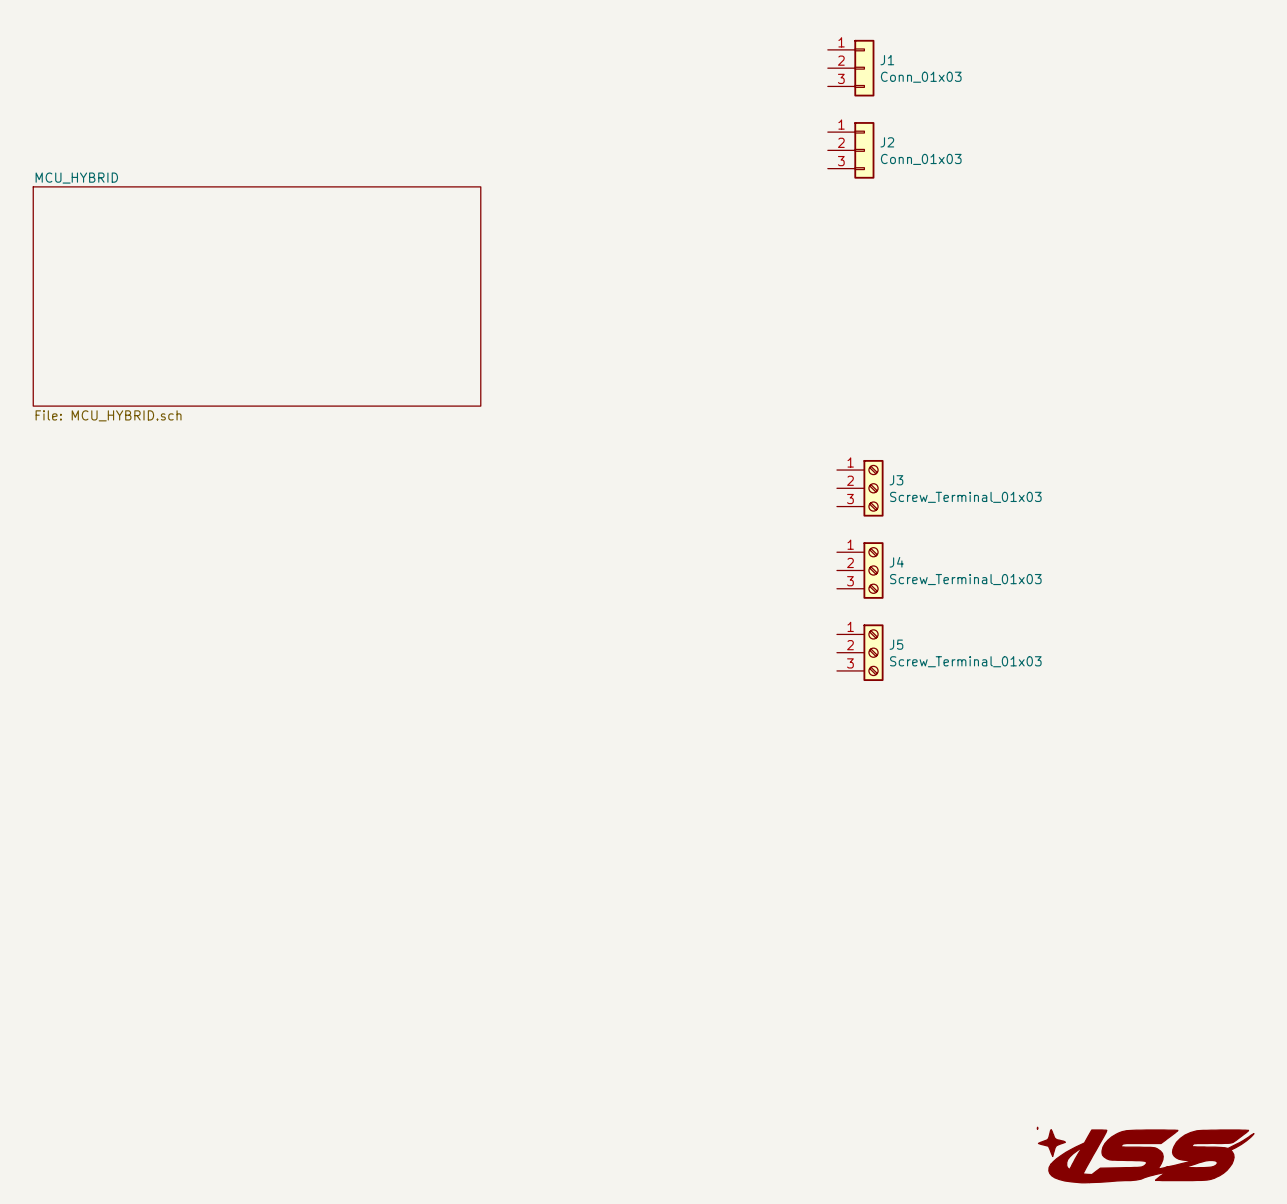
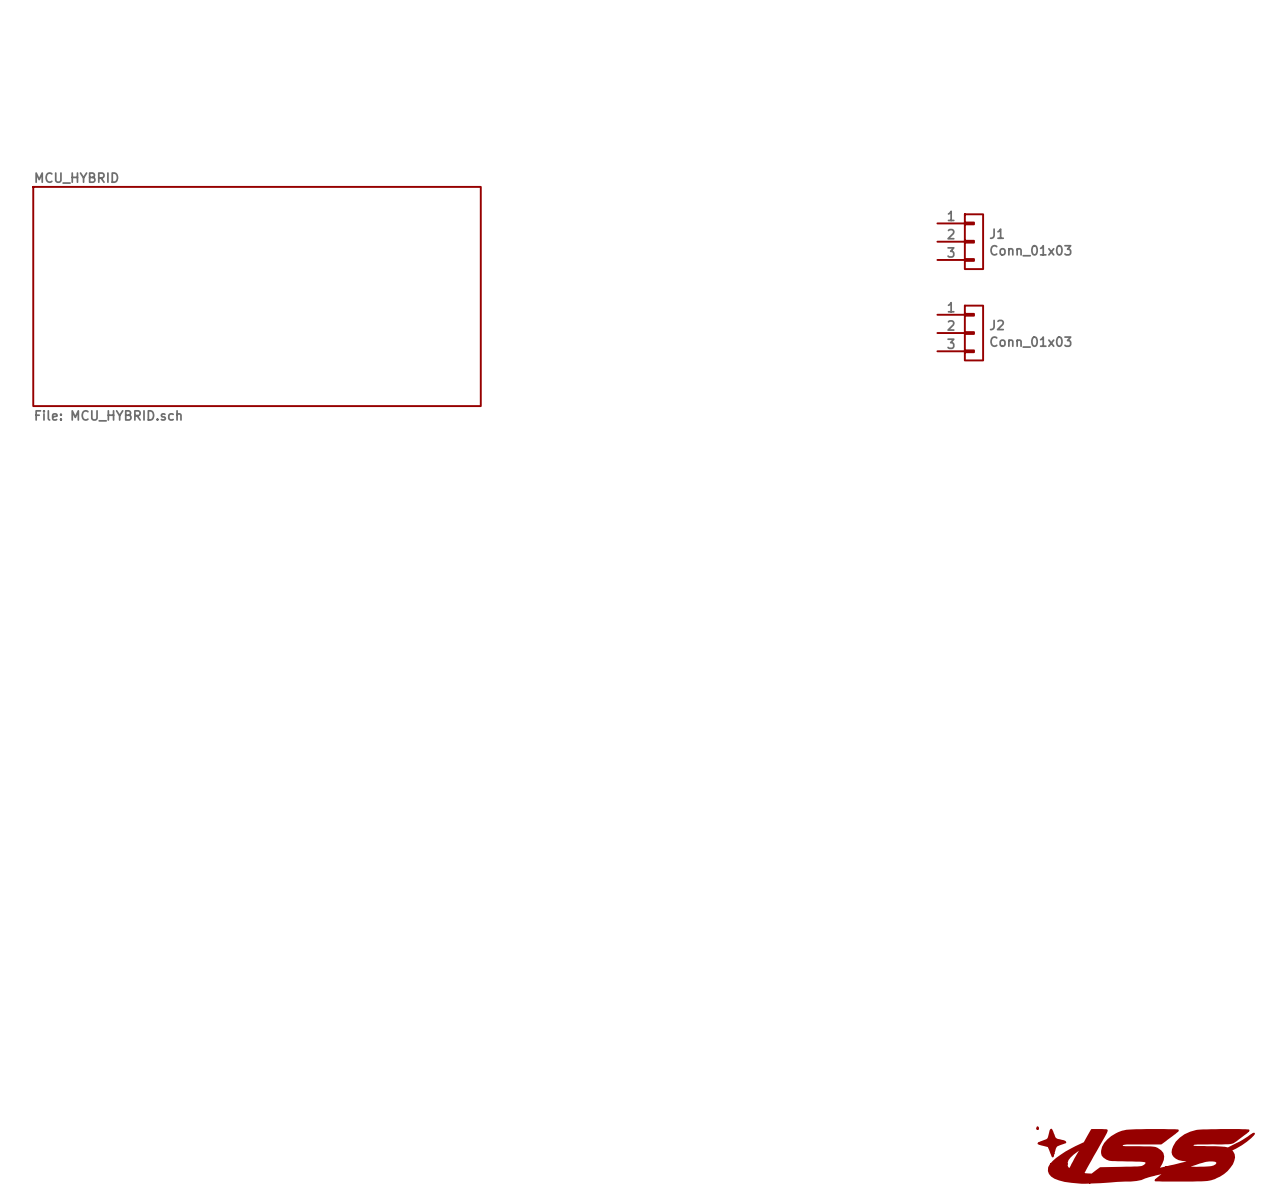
J1 position: (851, 68) -> (960, 241)
J2 position: (851, 150) -> (960, 333)
J3: Screw_Terminal_01x03 (860, 488) -> none
J4: Screw_Terminal_01x03 (860, 570) -> none
J5: Screw_Terminal_01x03 (860, 652) -> none

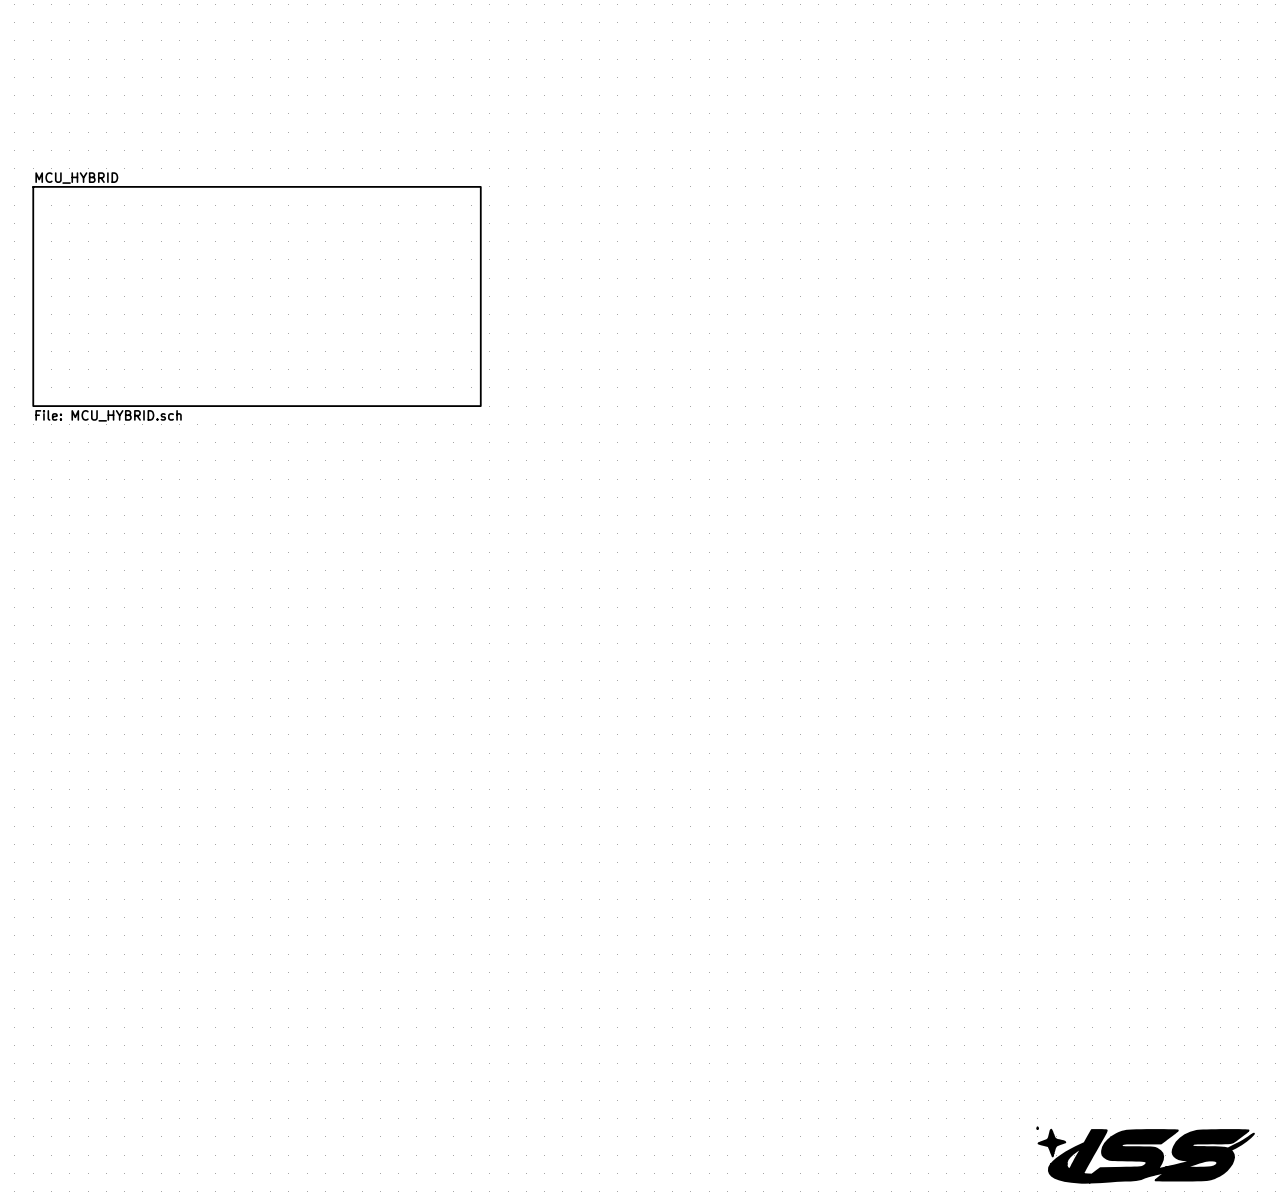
J1: Conn_01x03 (960, 241) -> none
J2: Conn_01x03 (960, 333) -> none

